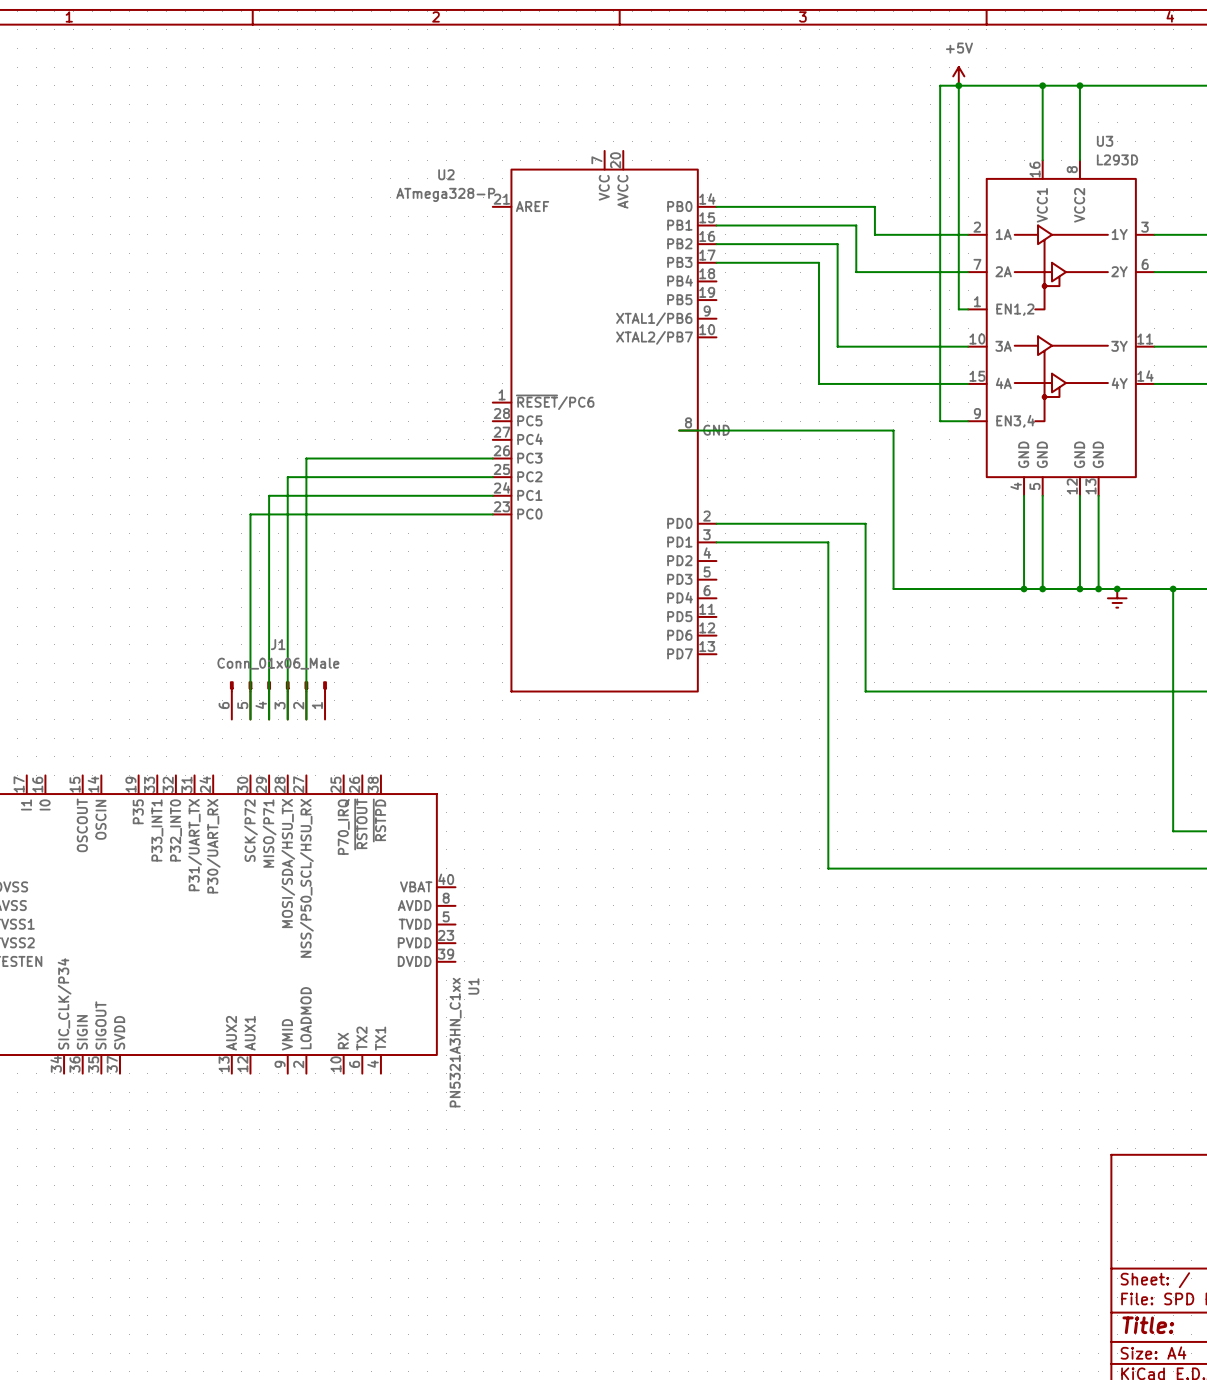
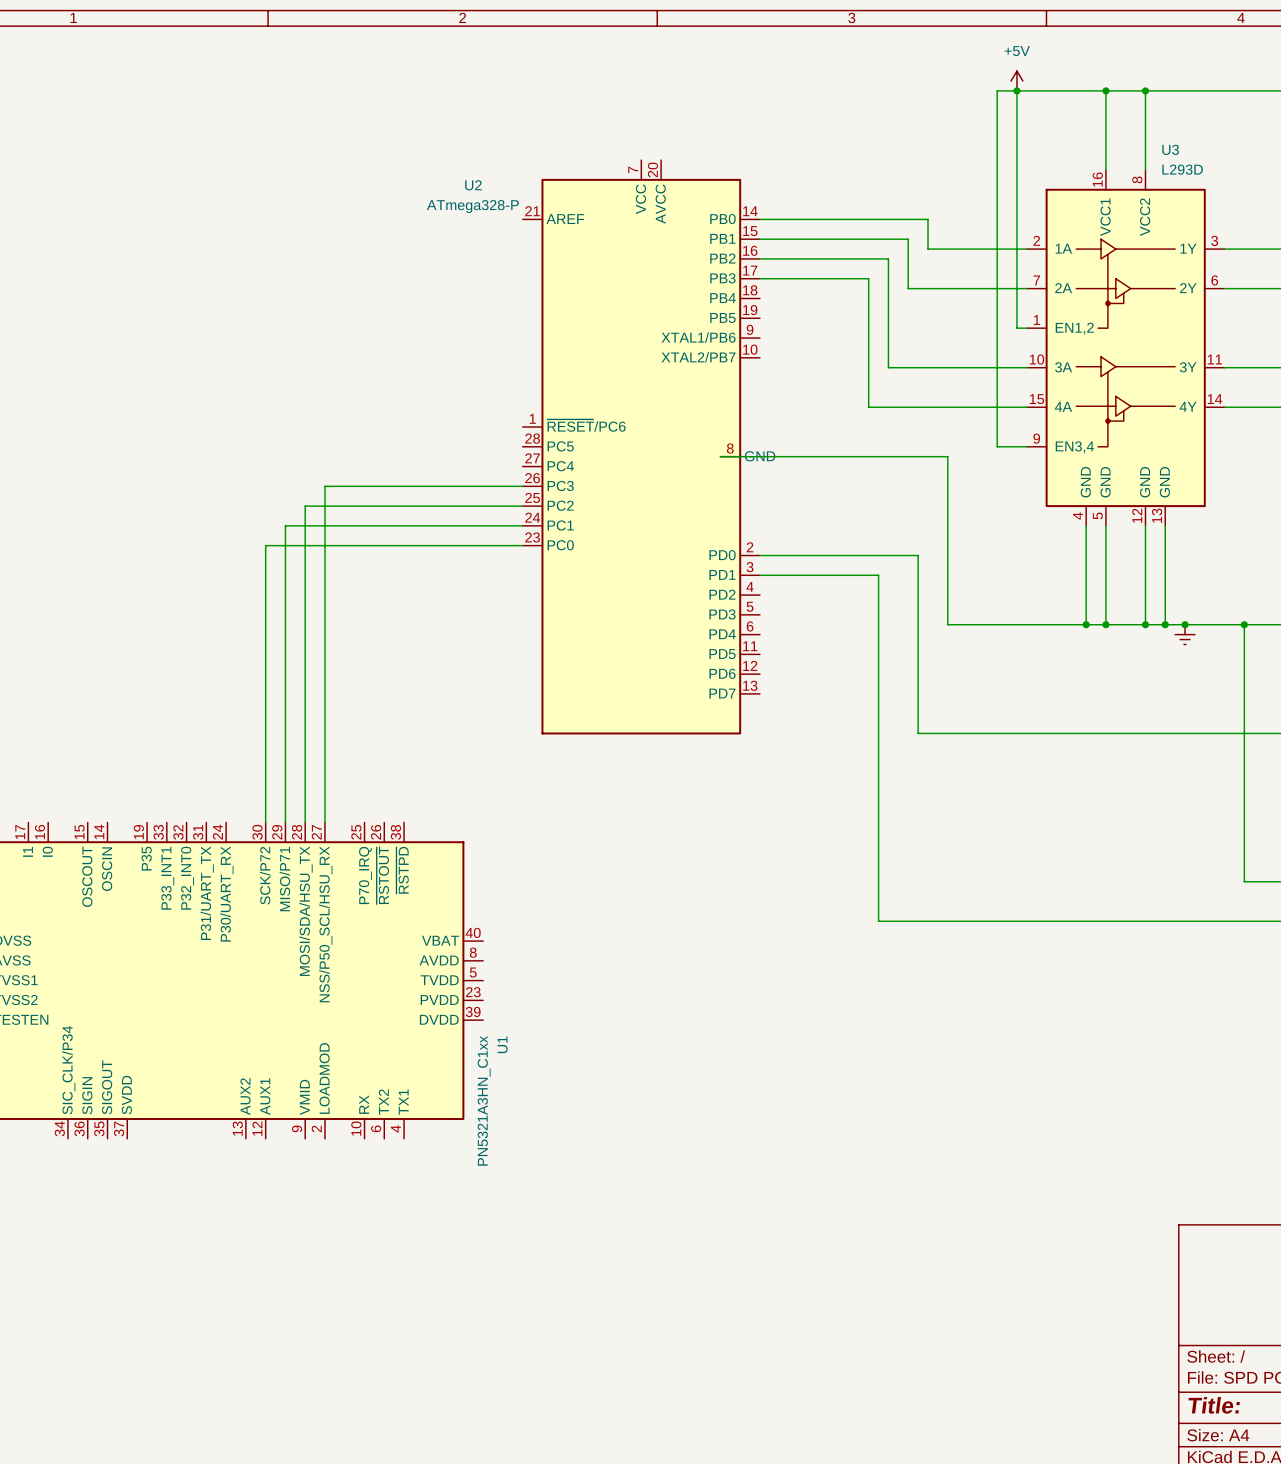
J1: Conn_01x06_Male (278, 700) -> none
wire: none -> (265, 763) (265, 822)
wire: none -> (285, 763) (285, 822)
wire: none -> (305, 763) (305, 822)
wire: none -> (324, 763) (324, 822)

